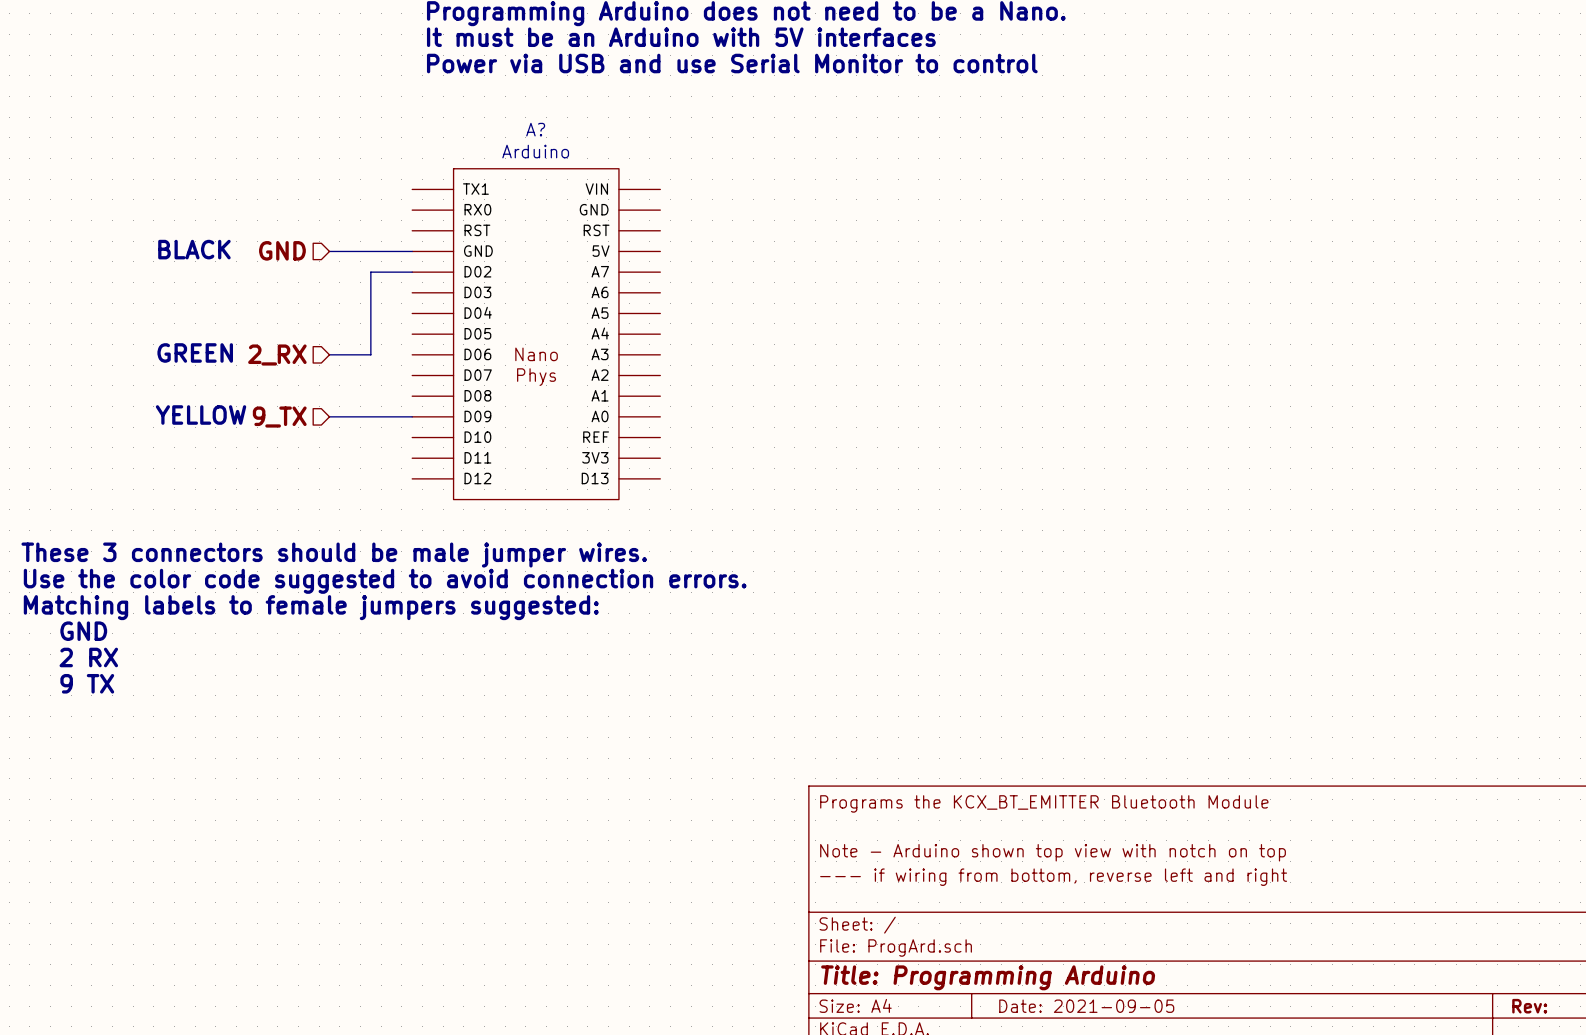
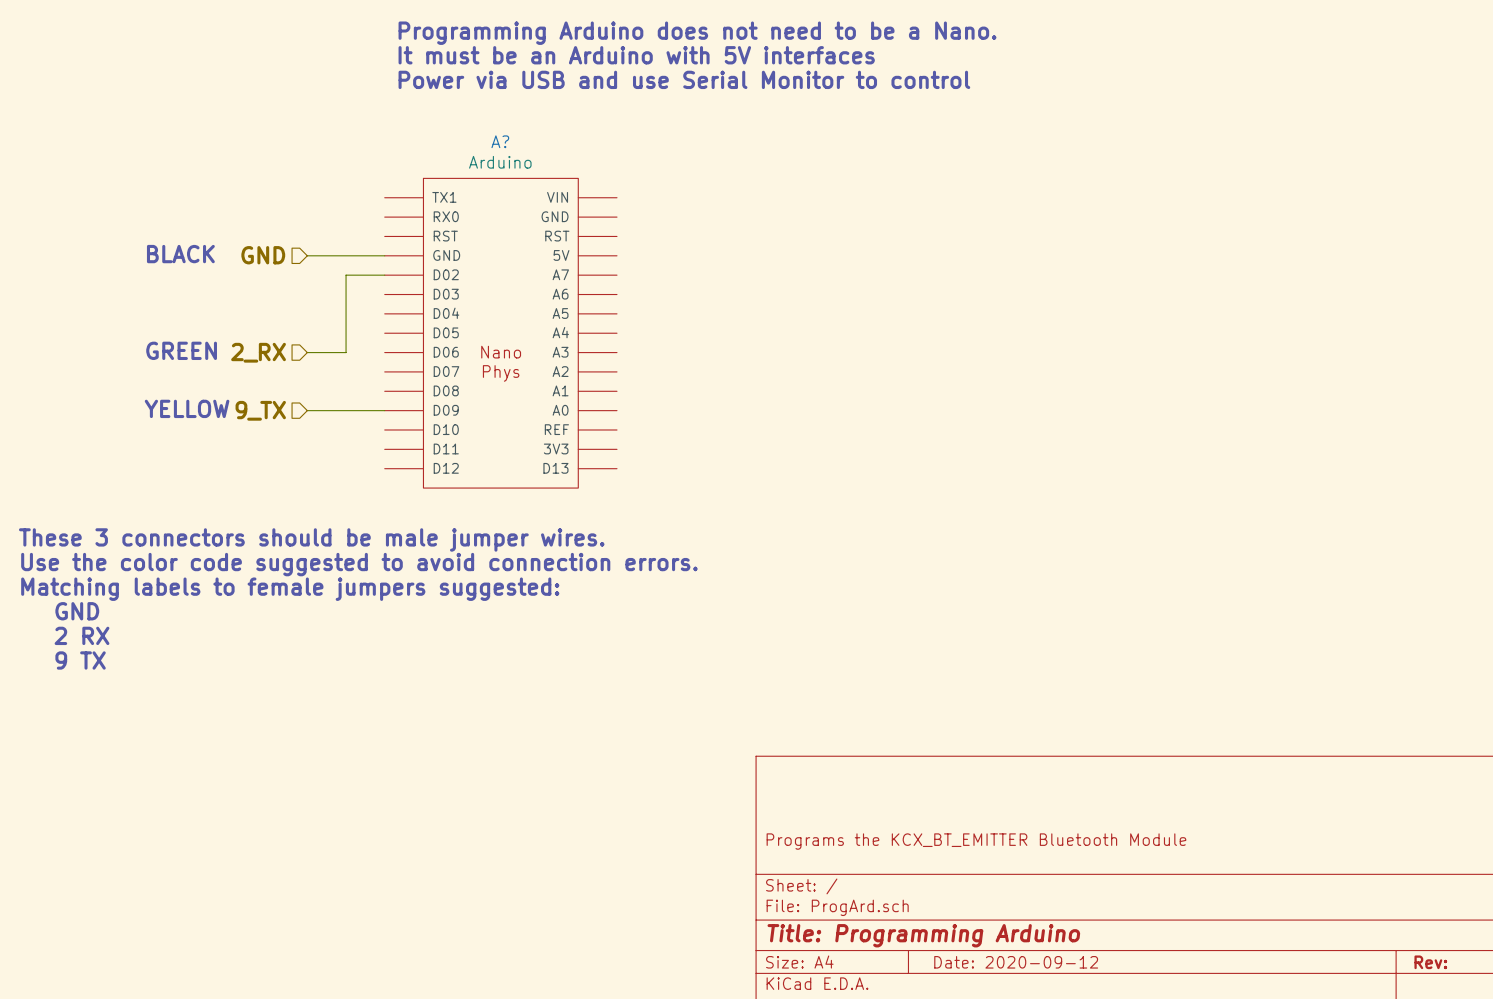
title block: Programs the KCX_BT_EMITTER Bluetooth Module (1044, 803) -> none
title block: Note - Arduino shown top view with notch on top (1053, 852) -> none
title block: --- if wiring from bottom, reverse left and right (1053, 877) -> Programs the KCX_BT_EMITTER Bluetooth Module (976, 841)
title block: Date: 2021-09-05 (1086, 1006) -> Date: 2020-09-12 (1016, 962)

